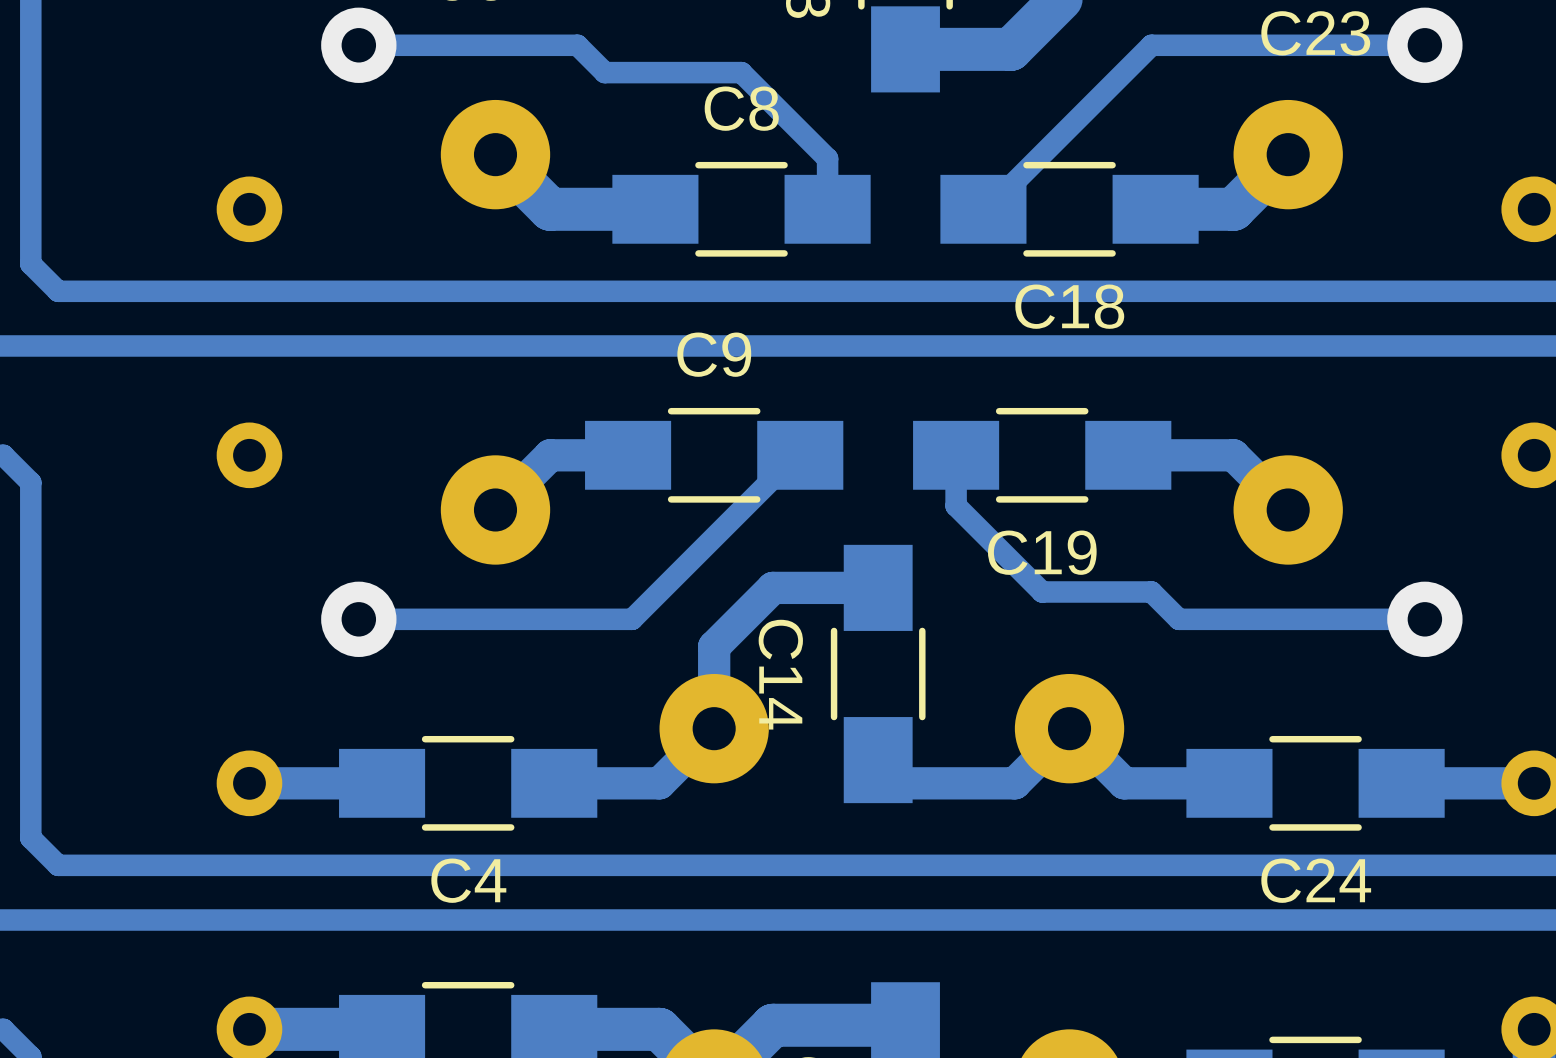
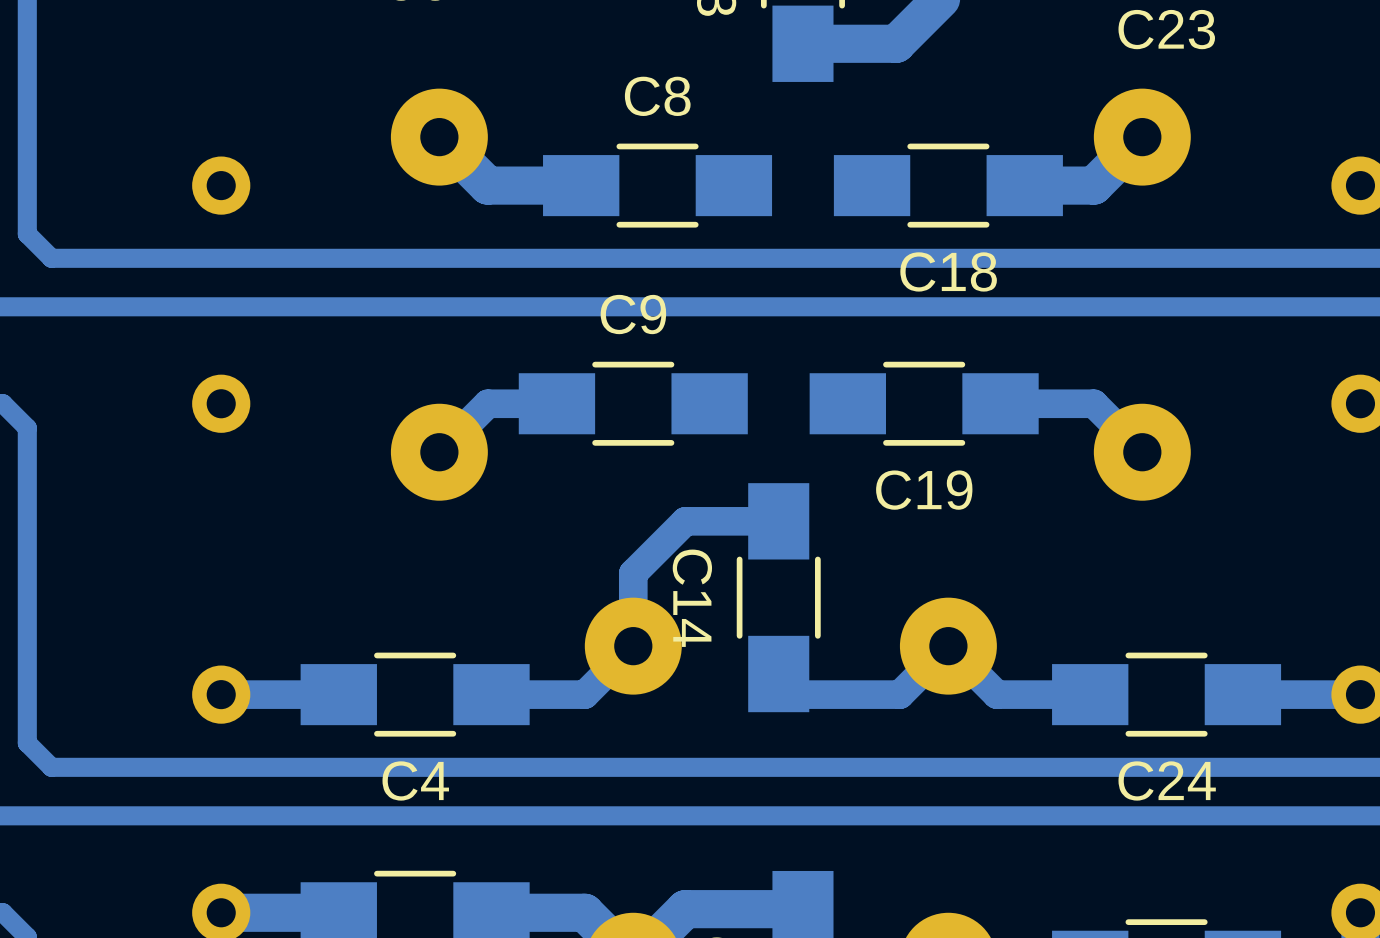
track: (358, 45) (577, 45) (604, 72) (741, 72) (827, 158) (827, 209) -> none
via: (358, 45) -> none
track: (1424, 45) (1151, 45) (987, 209) (983, 209) -> none
via: (1424, 45) -> none
track: (800, 455) (796, 455) (632, 619) (358, 619) -> none
track: (956, 455) (956, 505) (1042, 591) (1151, 591) (1178, 619) (1424, 619) -> none
via: (358, 619) -> none
via: (1424, 619) -> none

